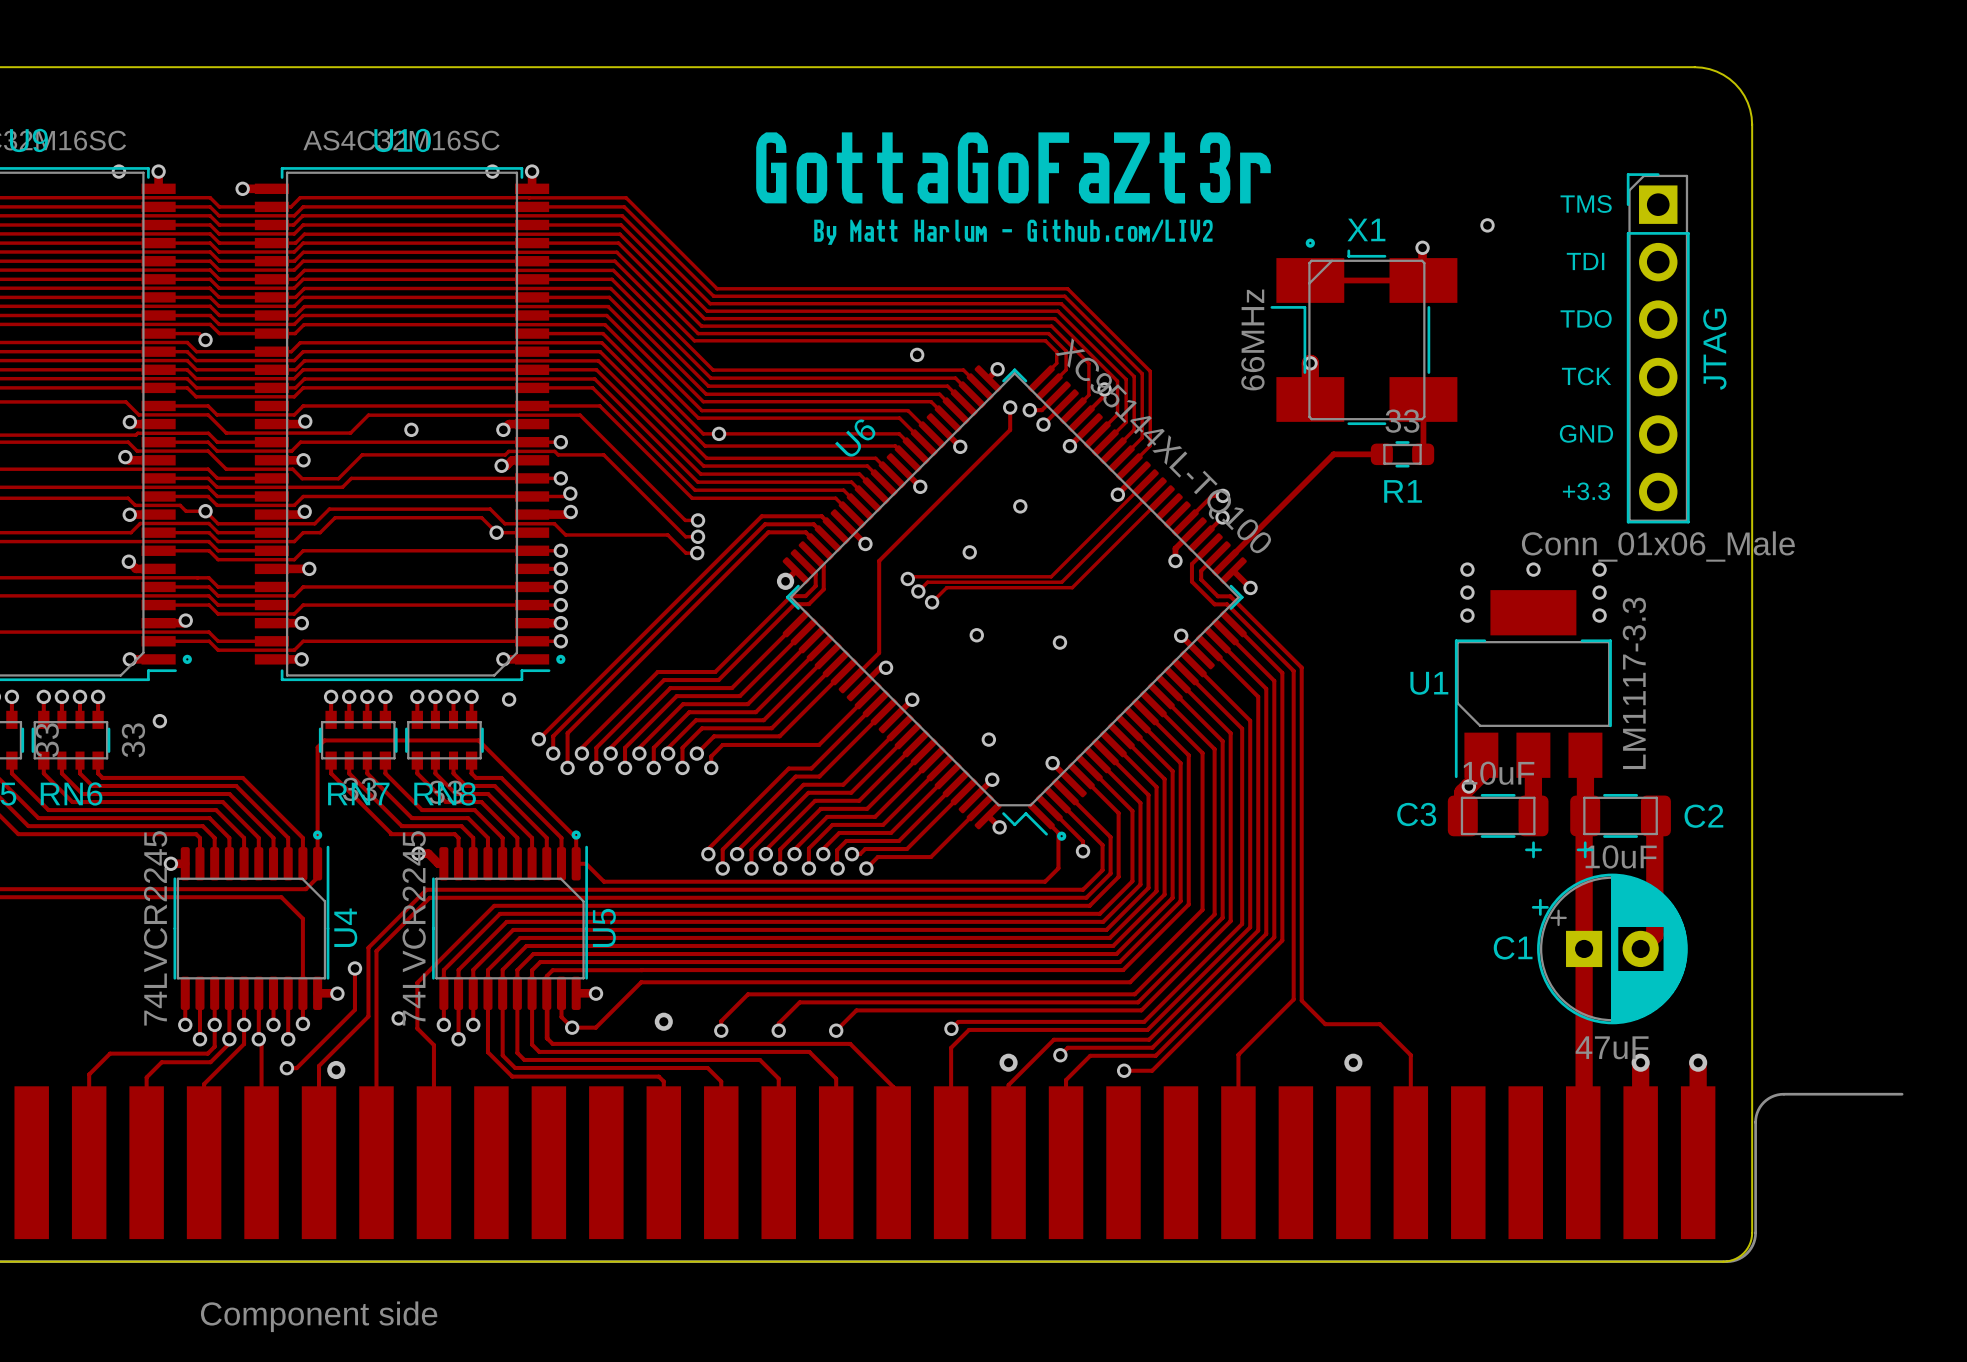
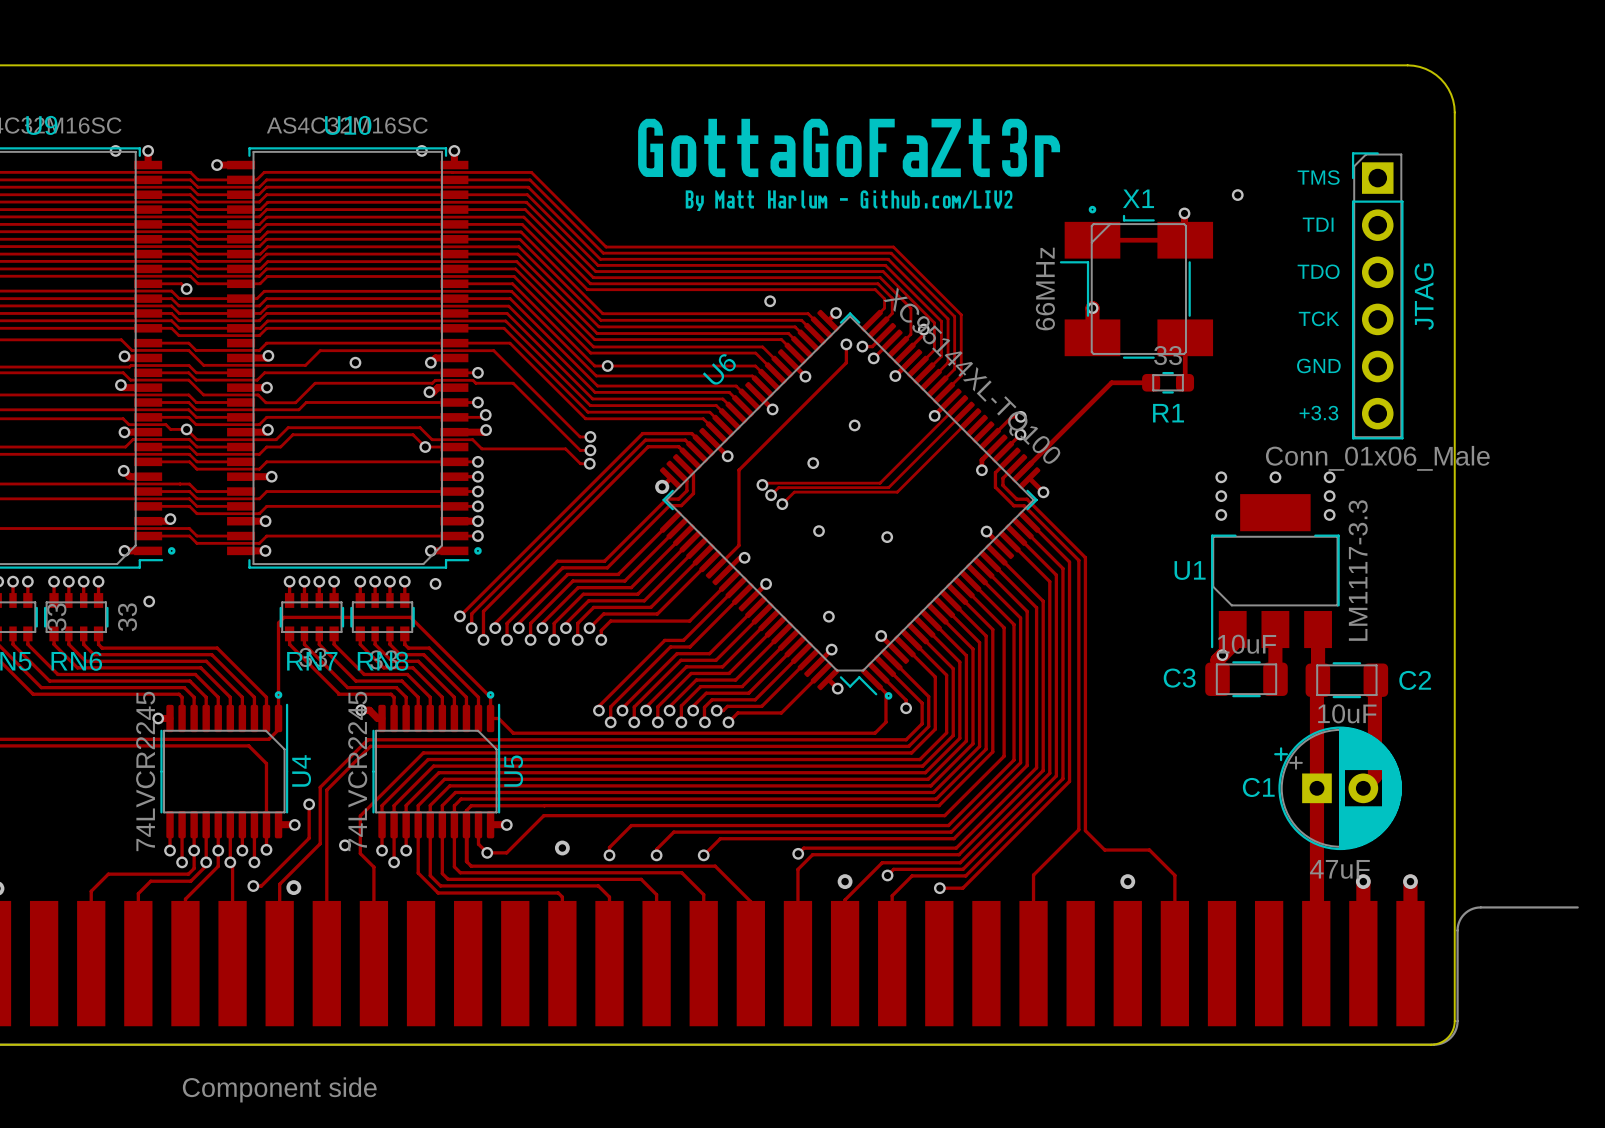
C3 footprint: [1447, 793, 1549, 859] -> [1205, 661, 1288, 698]
C2 footprint: [1570, 793, 1671, 859] -> [1305, 662, 1389, 699]

